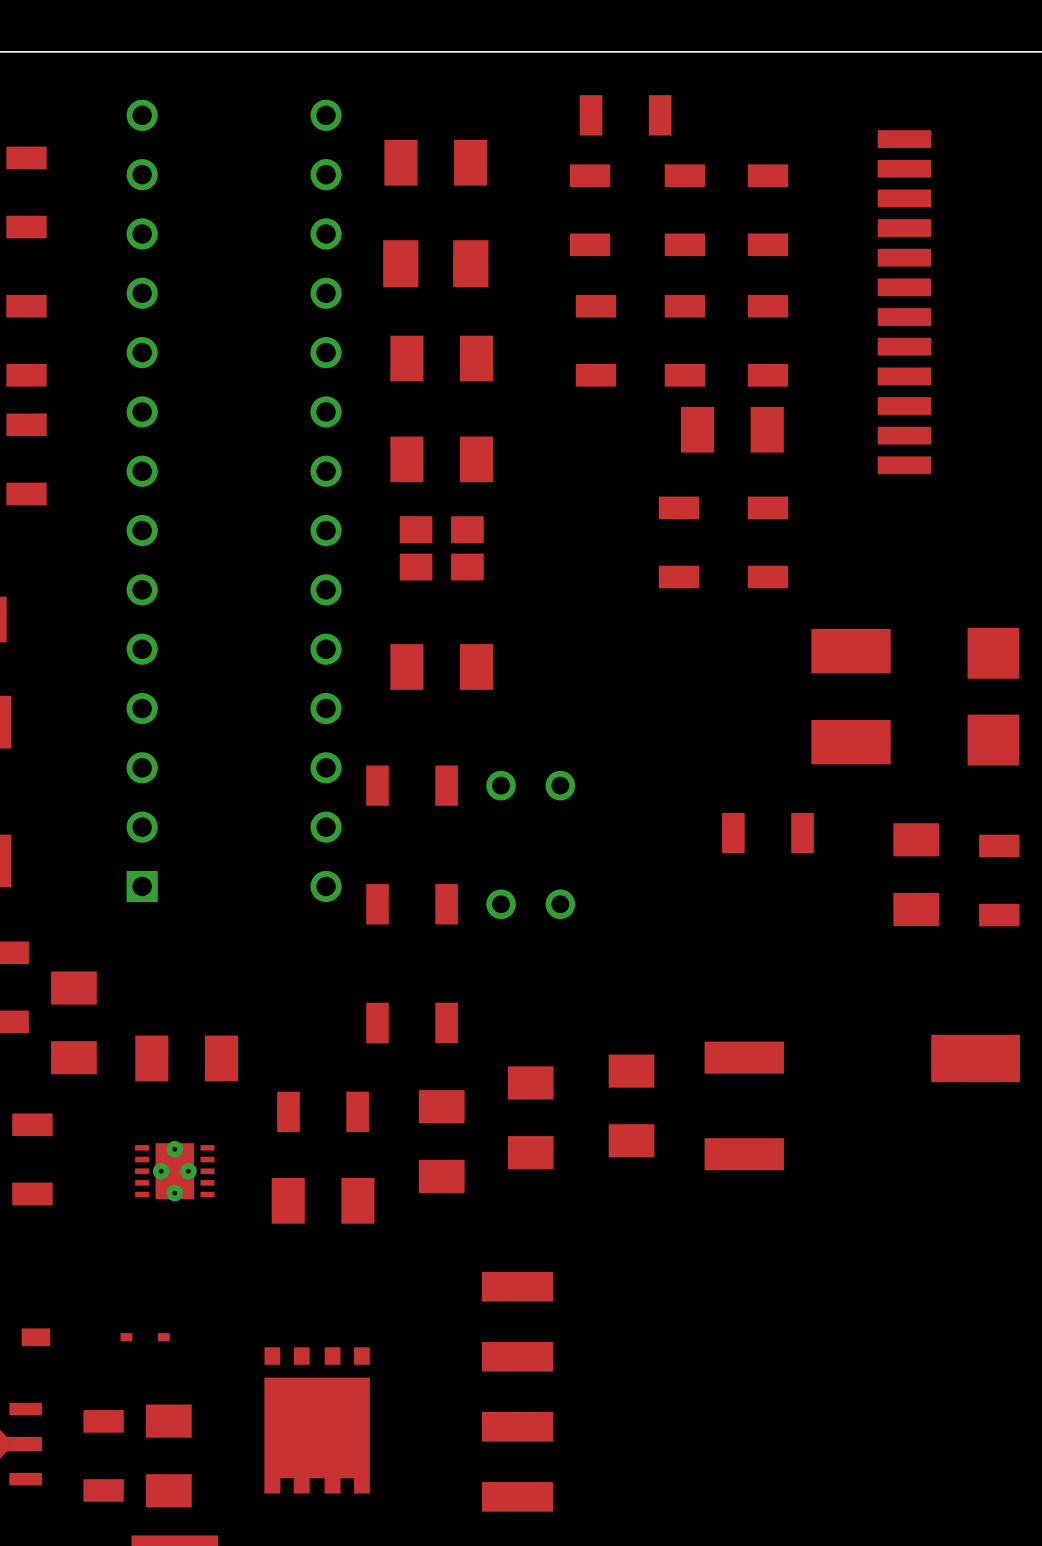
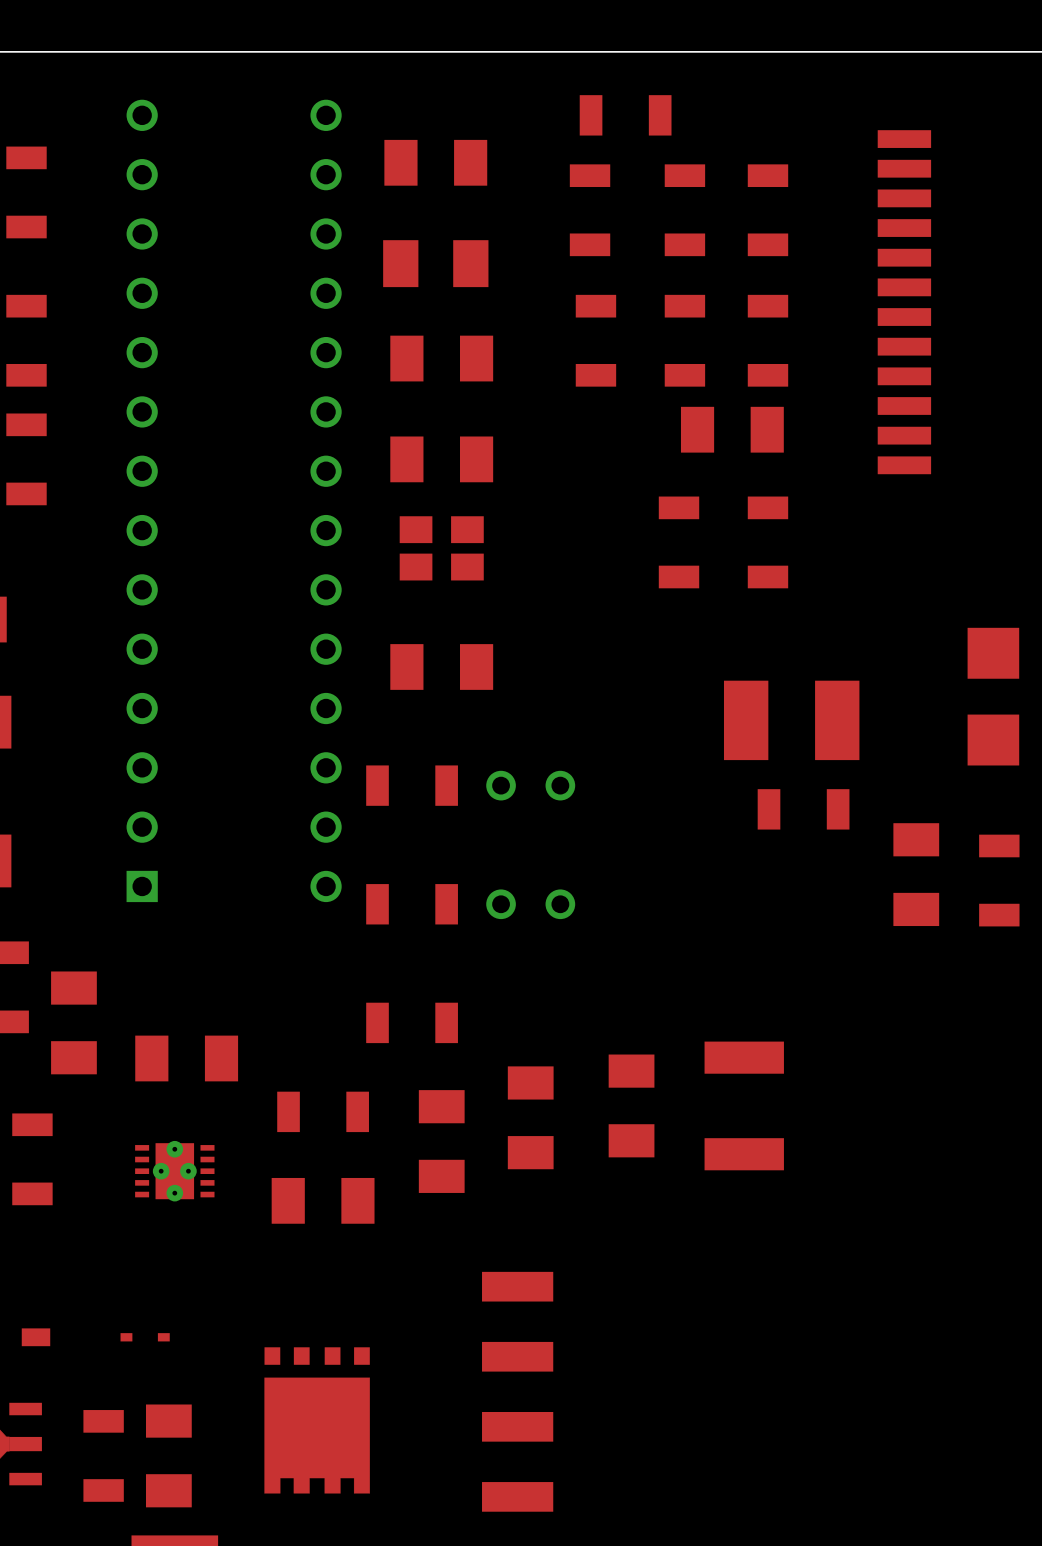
part rotation: 0° (851, 696) -> 90° clockwise (791, 720)
part position: (767, 833) -> (803, 809)
part: (975, 1058) -> none

